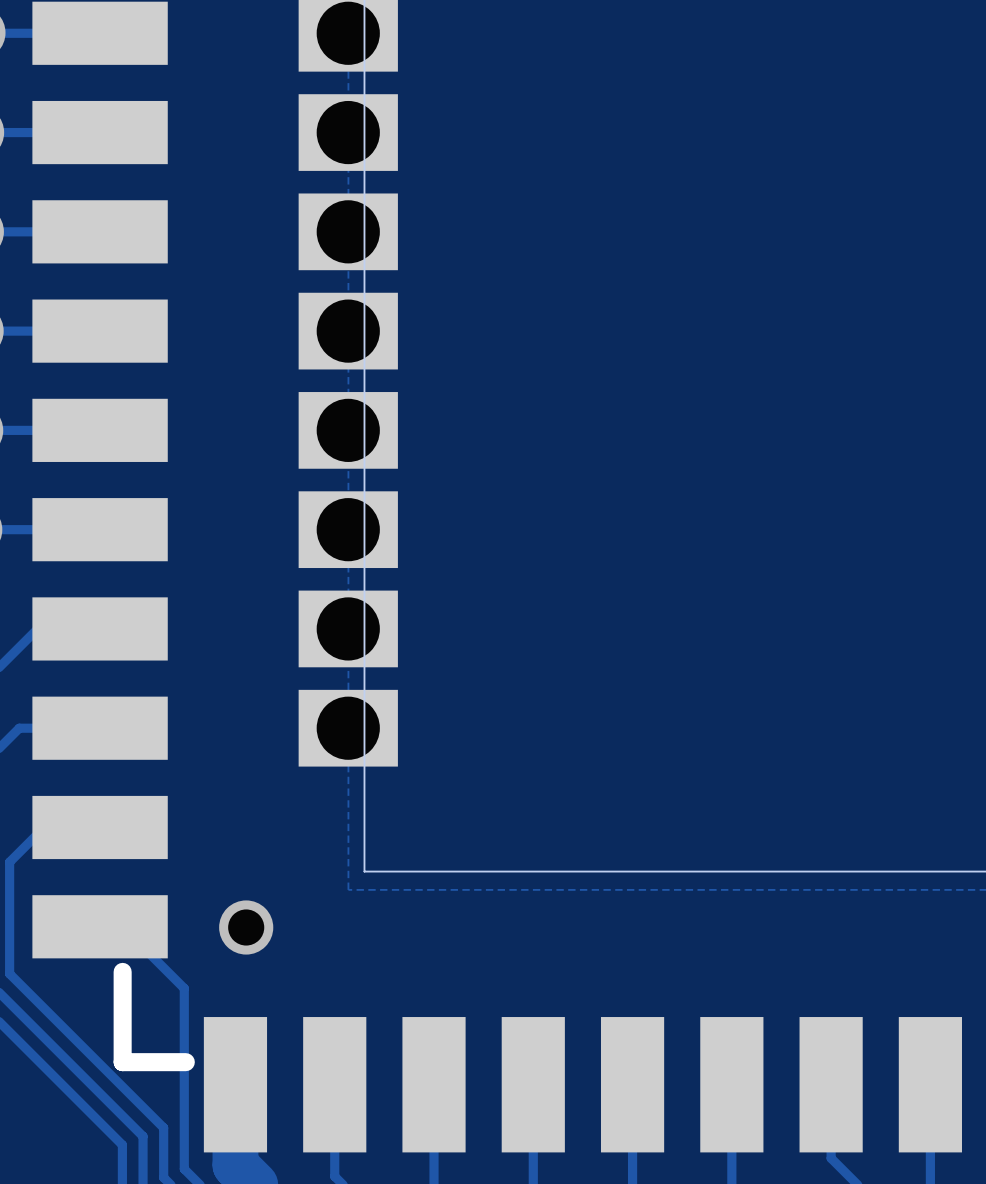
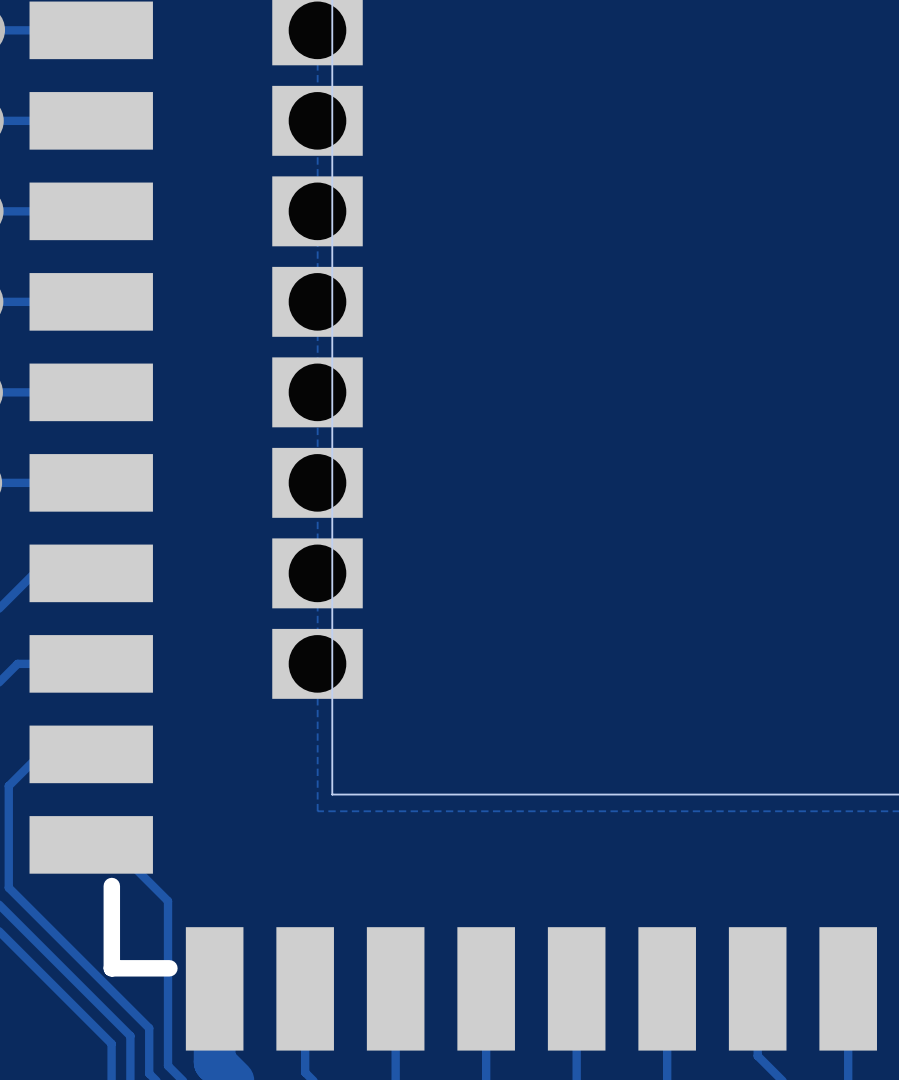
via: (246, 927) -> none

